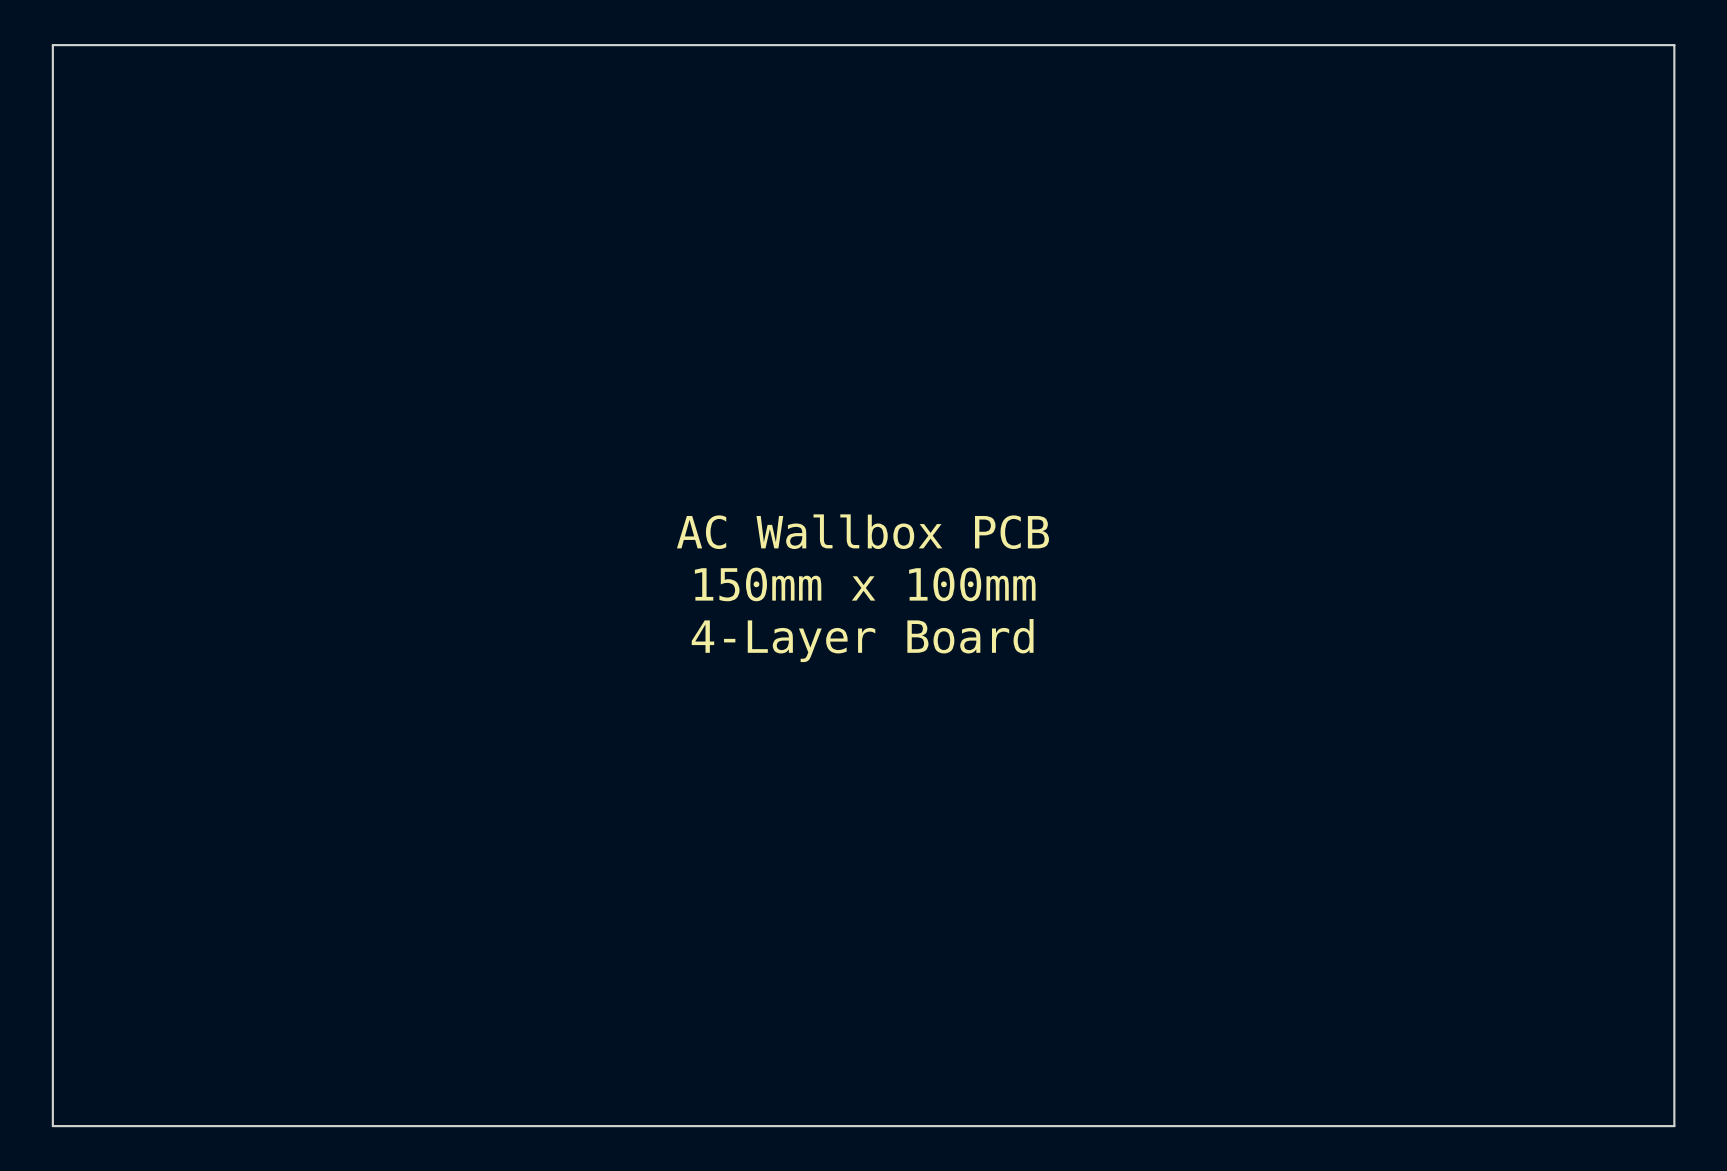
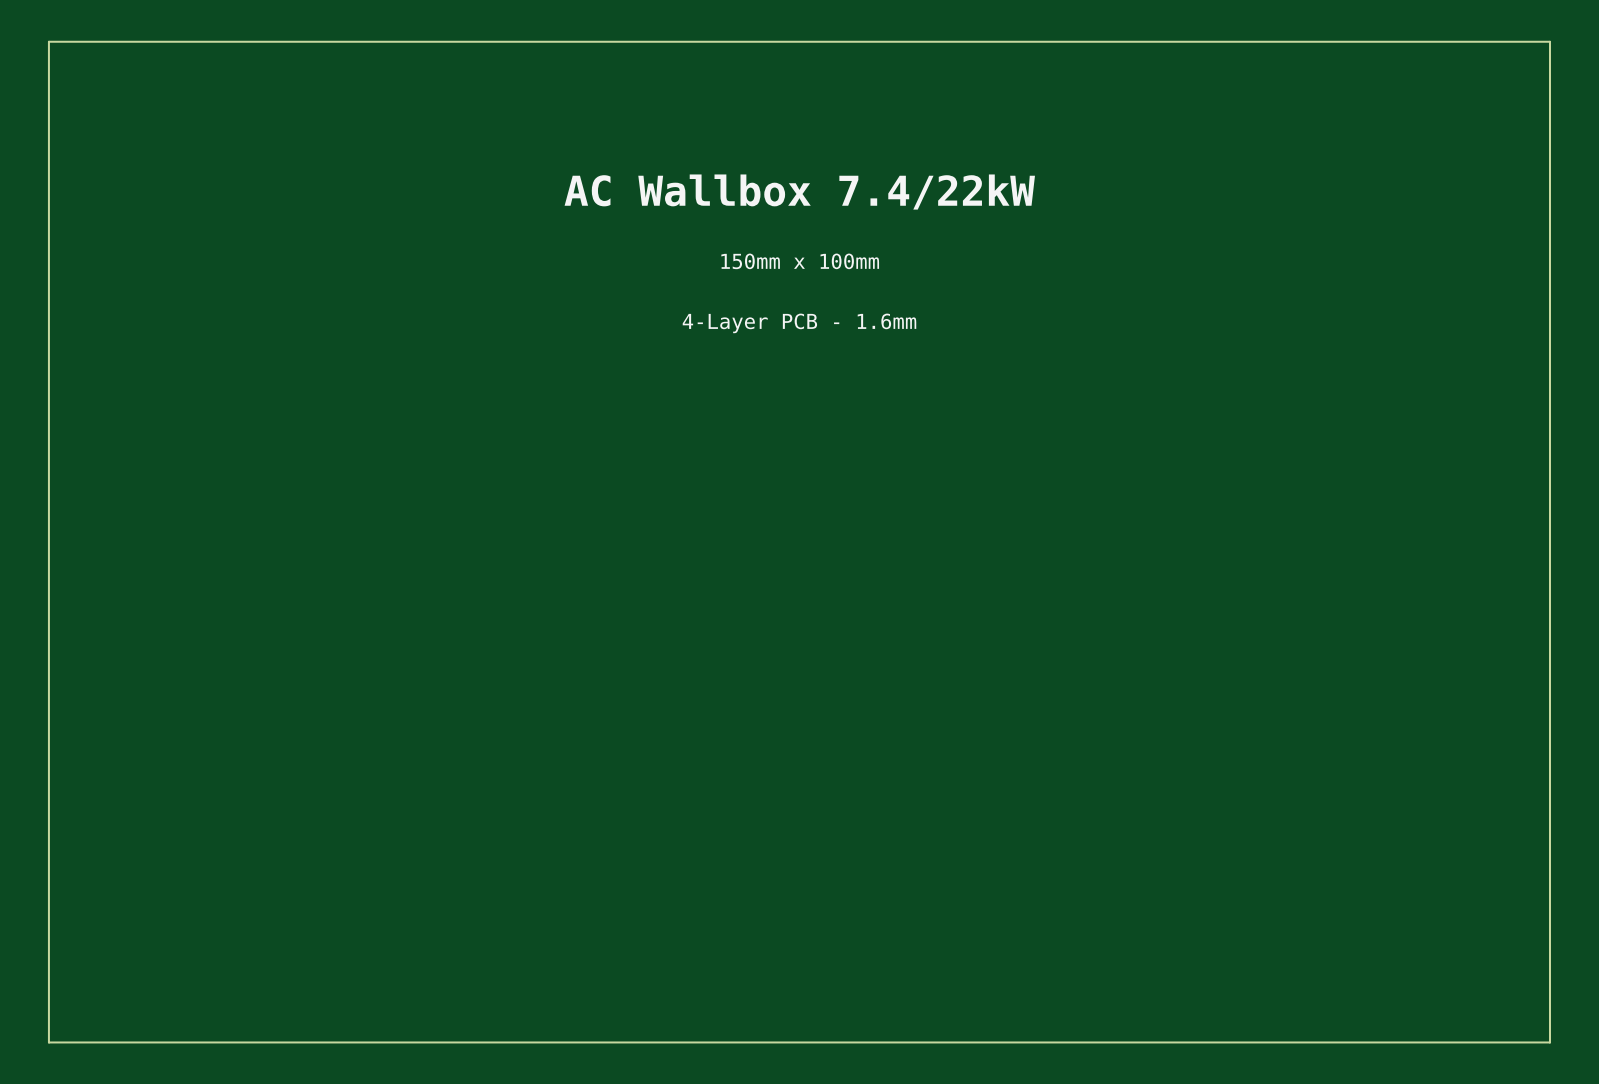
text: none -> AC Wallbox 7.4/22kW (799, 192)
text: none -> 150mm x 100mm (800, 261)
text: none -> 4-Layer PCB - 1.6mm (799, 323)
text: AC Wallbox PCB (862, 531) -> none
text: 150mm x 100mm (865, 584) -> none
text: 4-Layer Board (862, 640) -> none

